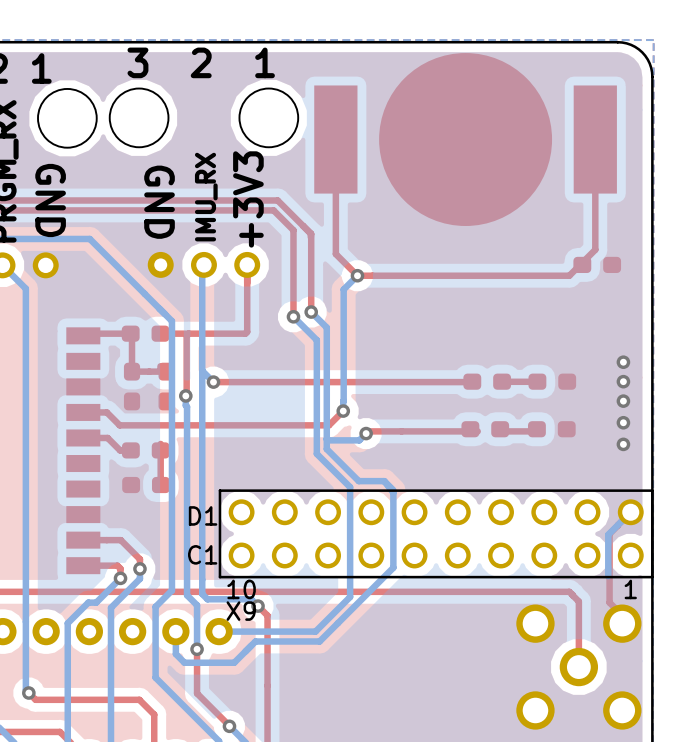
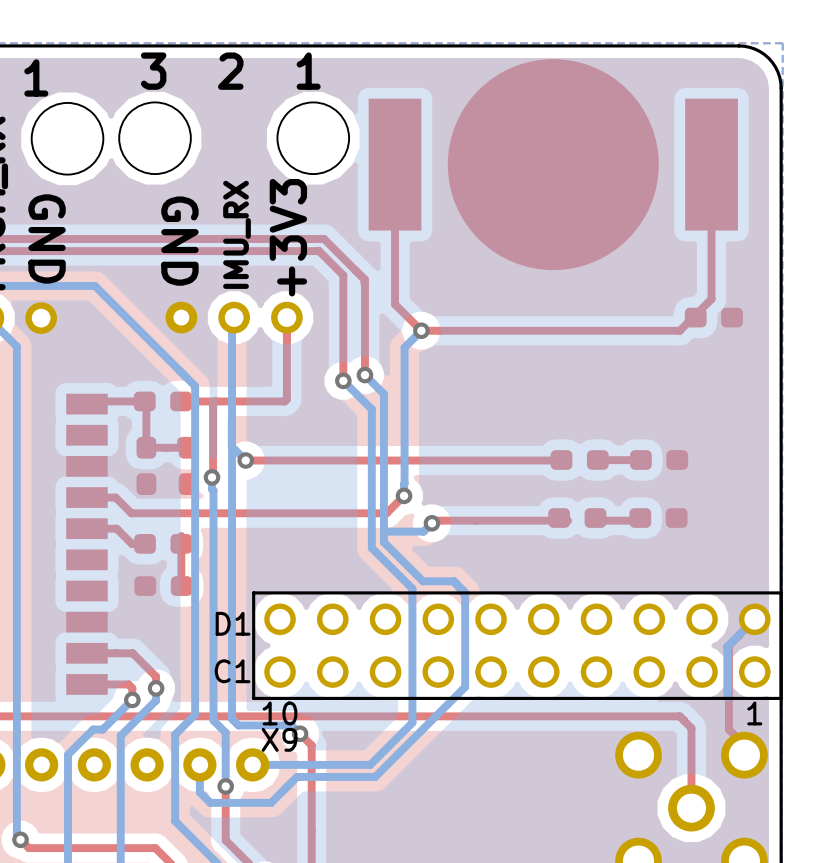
via: (623, 362) -> none
via: (623, 381) -> none
via: (623, 401) -> none
via: (623, 422) -> none
via: (623, 444) -> none

